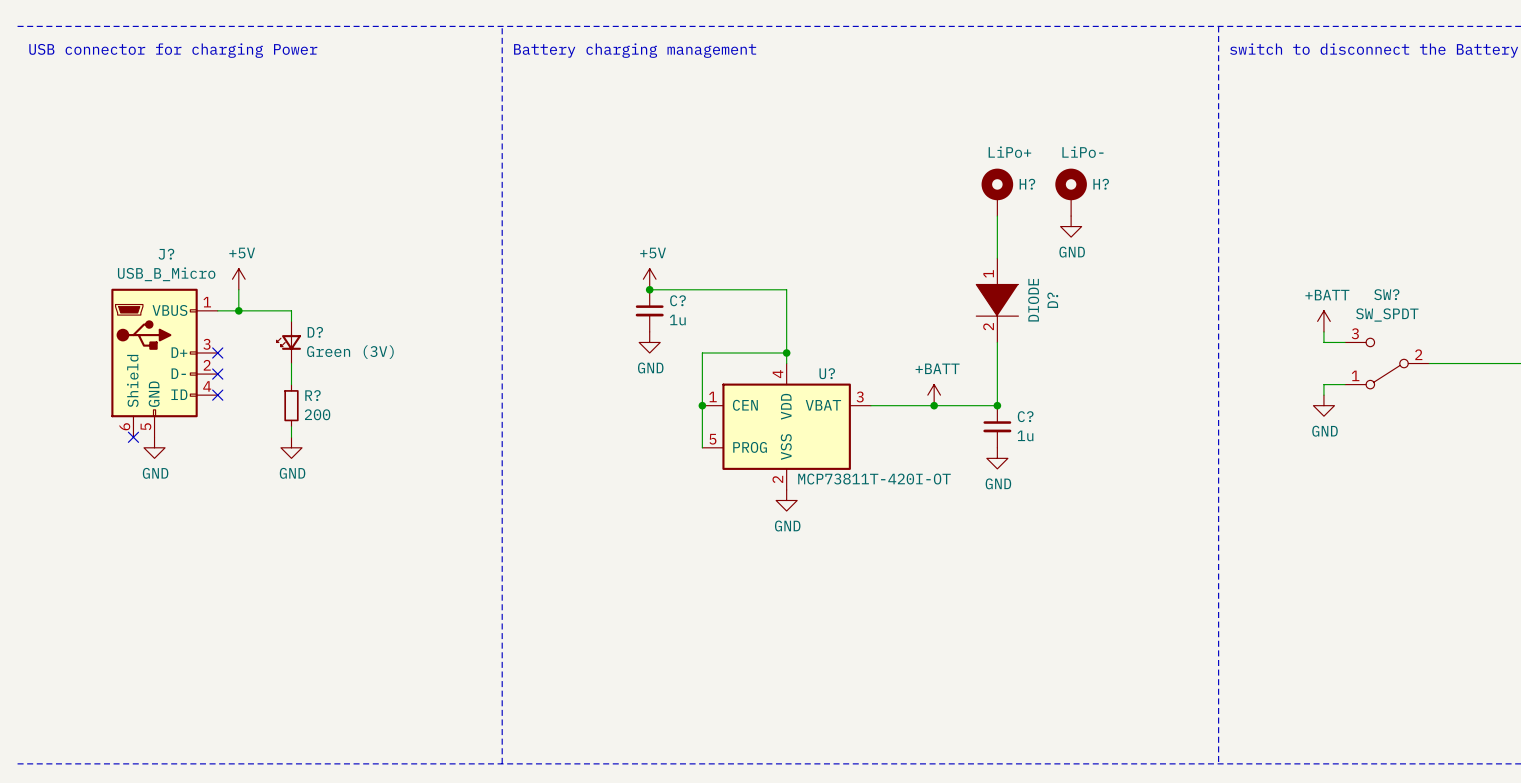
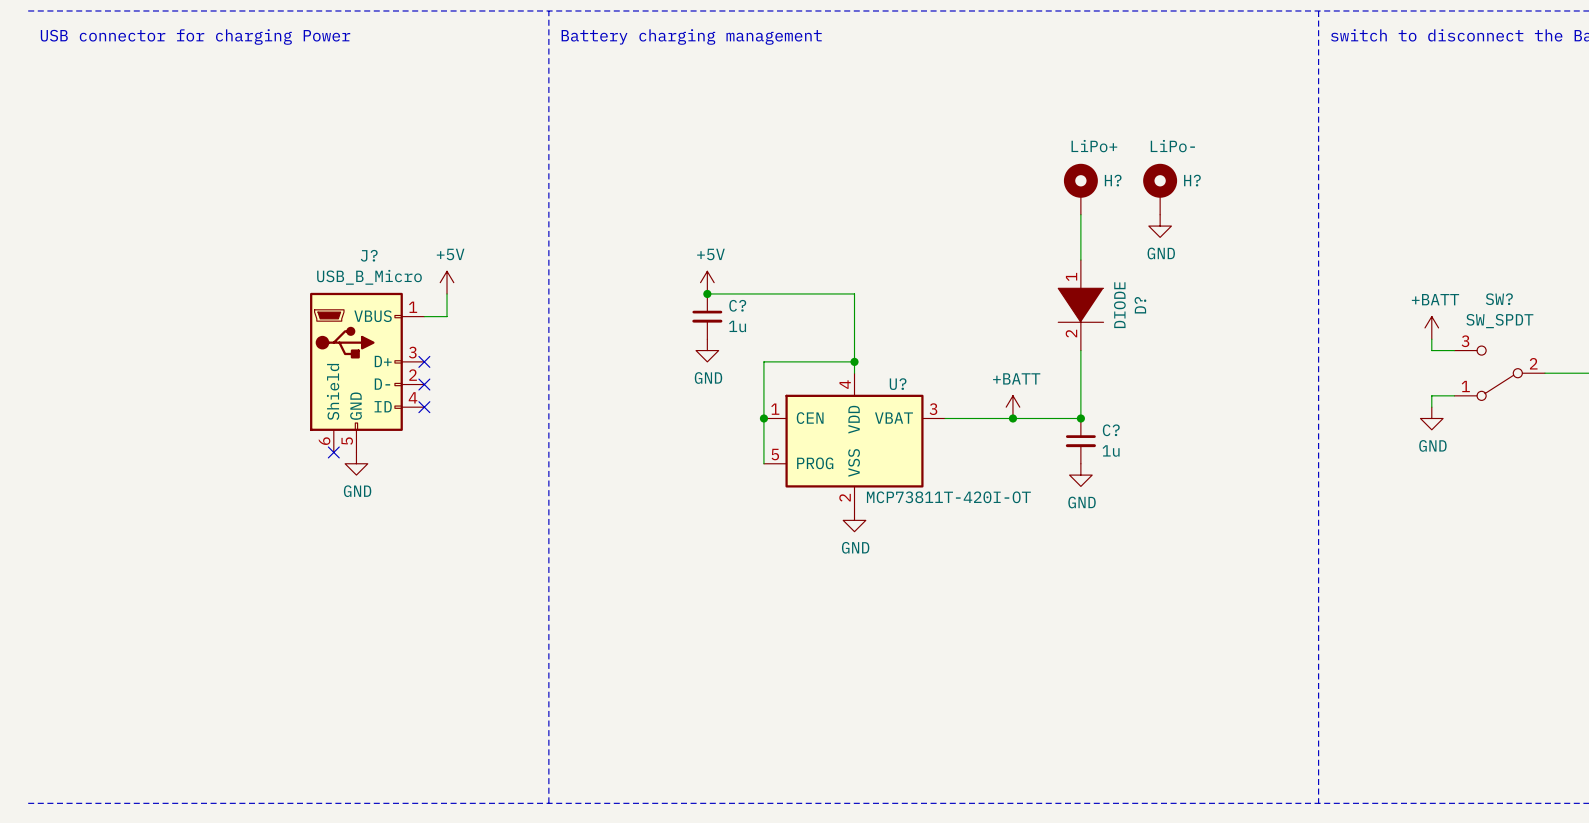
power symbol position: +5V (238, 279) -> +5V (447, 282)
wire: (238, 289) (238, 310) -> none
wire: none -> (447, 293) (447, 316) (424, 316)
wire: (217, 310) (291, 310) (291, 321) -> none
junction: (238, 310) -> none
D?: Green (3V) (288, 342) -> none
no-connect mark: (217, 353) -> none
no-connect mark: none -> (424, 361)
J? position: (164, 363) -> (367, 372)
no-connect mark: (217, 374) -> none
no-connect mark: none -> (424, 384)
no-connect mark: (217, 395) -> none
no-connect mark: none -> (424, 407)
R?: 200 (291, 405) -> none
wire: (291, 426) (291, 437) -> none
no-connect mark: (133, 437) -> none
no-connect mark: none -> (333, 452)
power symbol: GND (154, 447) -> none
power symbol position: GND (291, 447) -> GND (356, 463)

